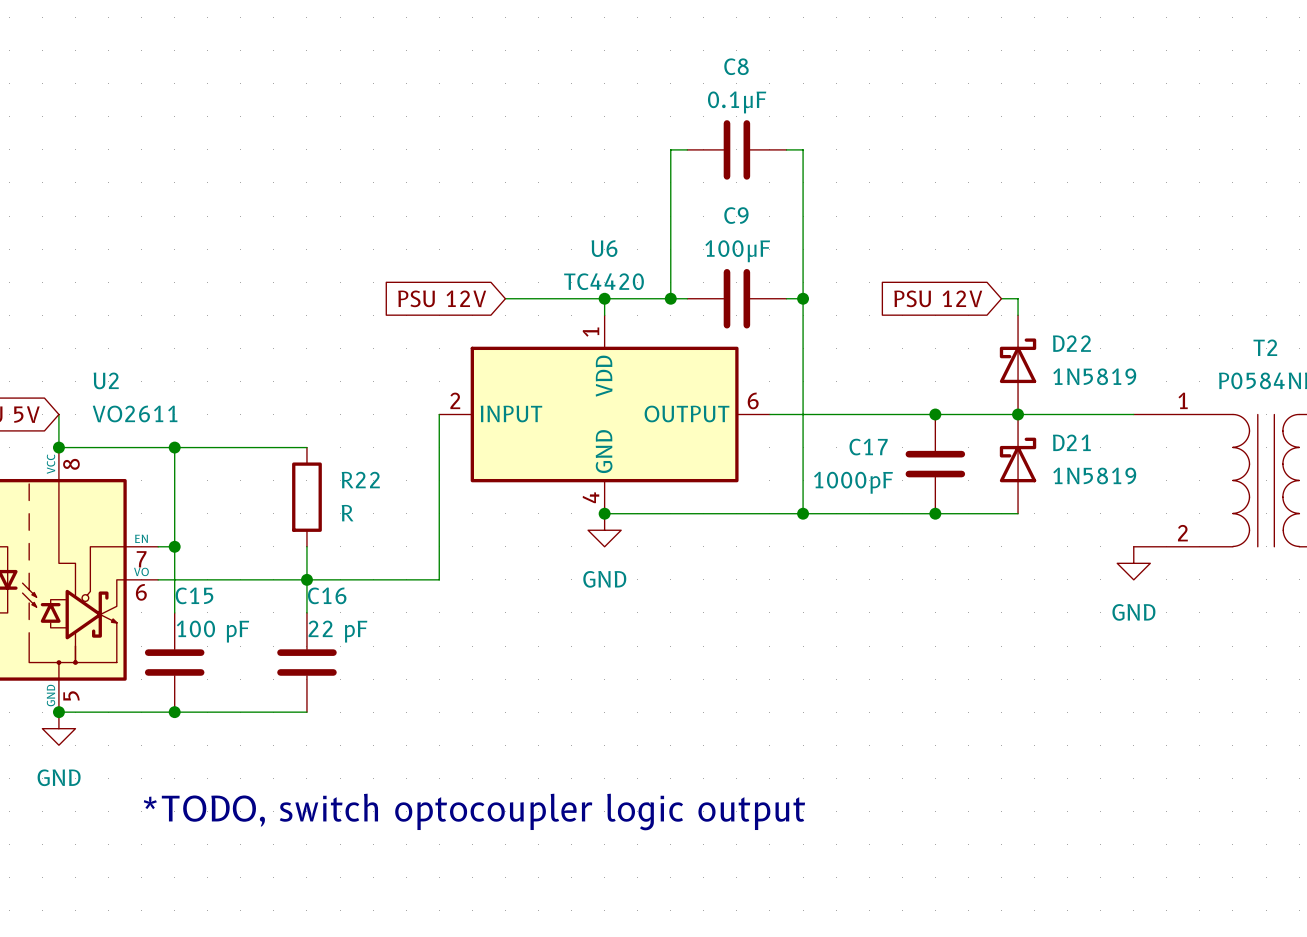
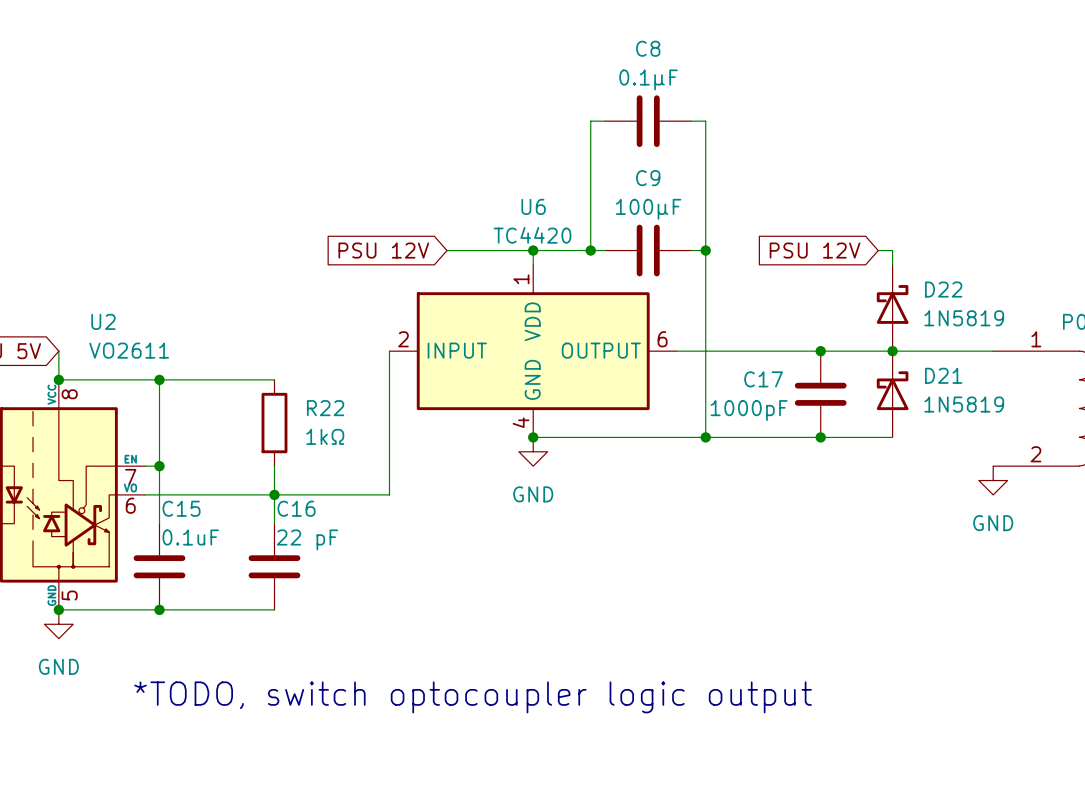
R22 value: R (347, 513) -> 1kΩ (325, 436)
C15 value: 100 pF (212, 631) -> 0.1uF (190, 537)

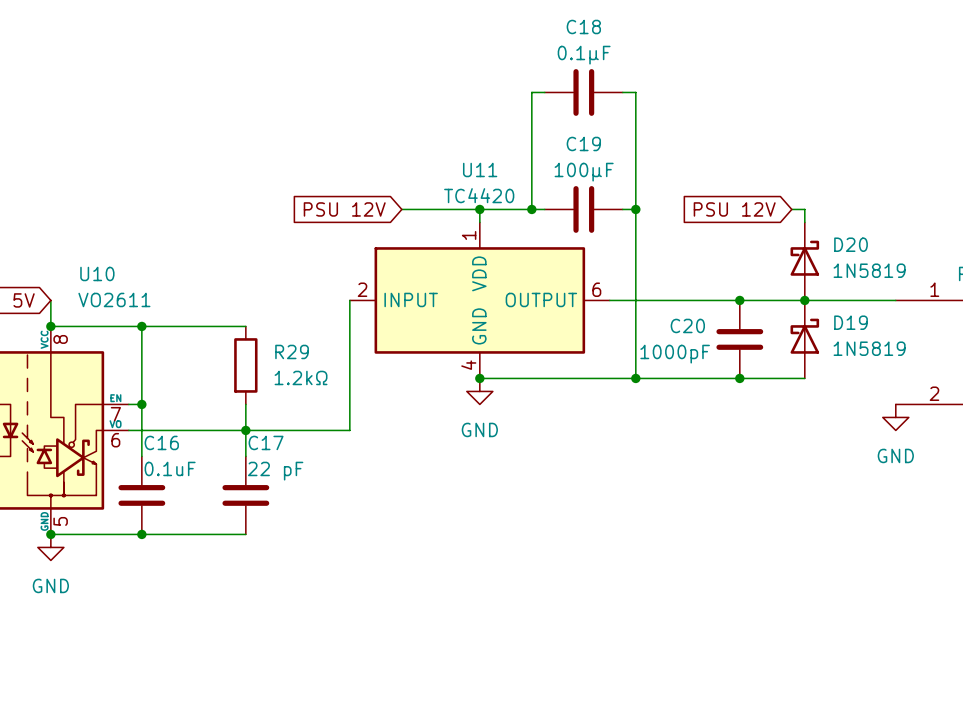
C8 name: C8 (648, 48) -> C18 (583, 26)
C9 name: C9 (648, 178) -> C19 (583, 143)
U6 name: U6 (533, 206) -> U11 (480, 169)
D22 name: D22 (943, 289) -> D20 (851, 244)
U2 name: U2 (103, 321) -> U10 (97, 273)
D21 name: D21 (943, 375) -> D19 (851, 322)
C17 name: C17 (763, 379) -> C20 (687, 325)
R22 name: R22 (325, 408) -> R29 (292, 351)
R22 value: 1kΩ (325, 436) -> 1.2kΩ (301, 377)
C15 name: C15 (181, 508) -> C16 (161, 442)
C16 name: C16 (296, 508) -> C17 (266, 442)
text: *TODO, switch optocoupler logic output (473, 697) -> none

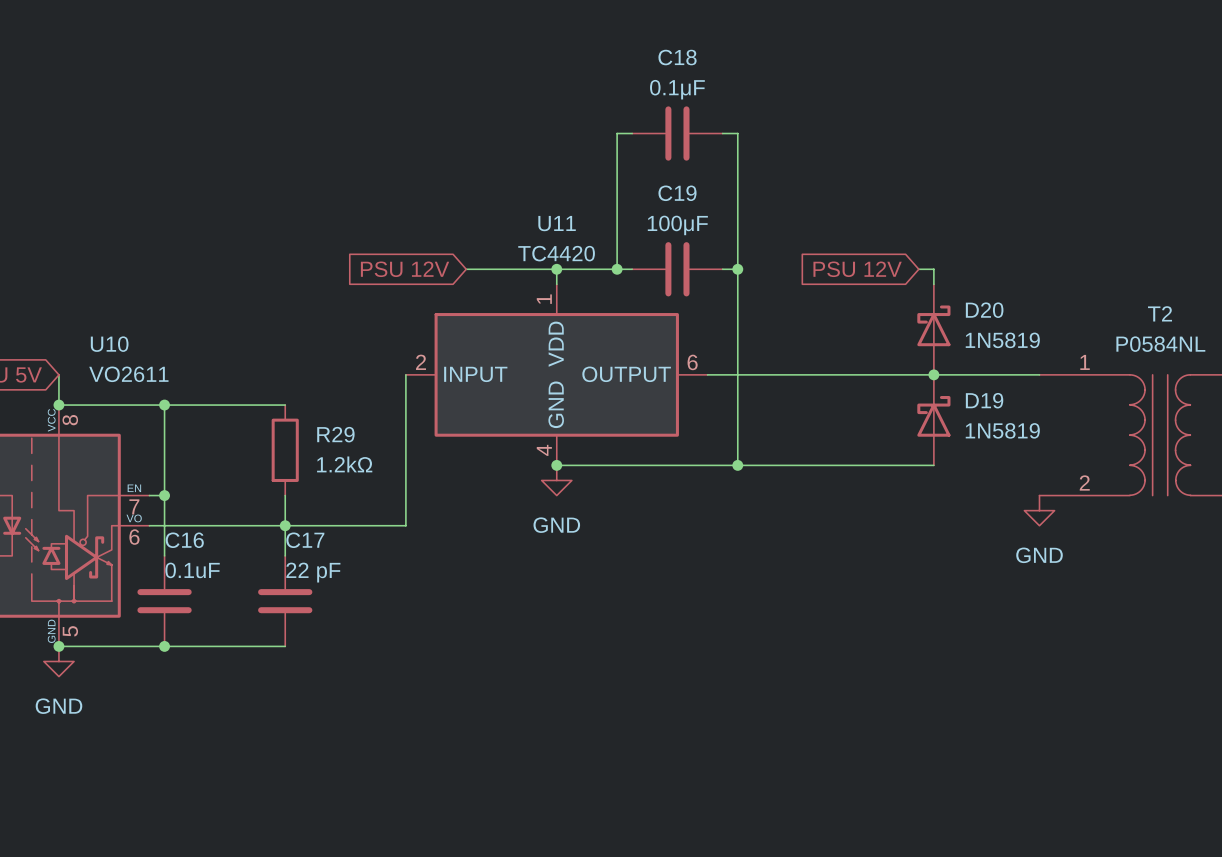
junction: (739, 300) -> none
C20: 1000pF (739, 339) -> none
junction: (739, 378) -> none

